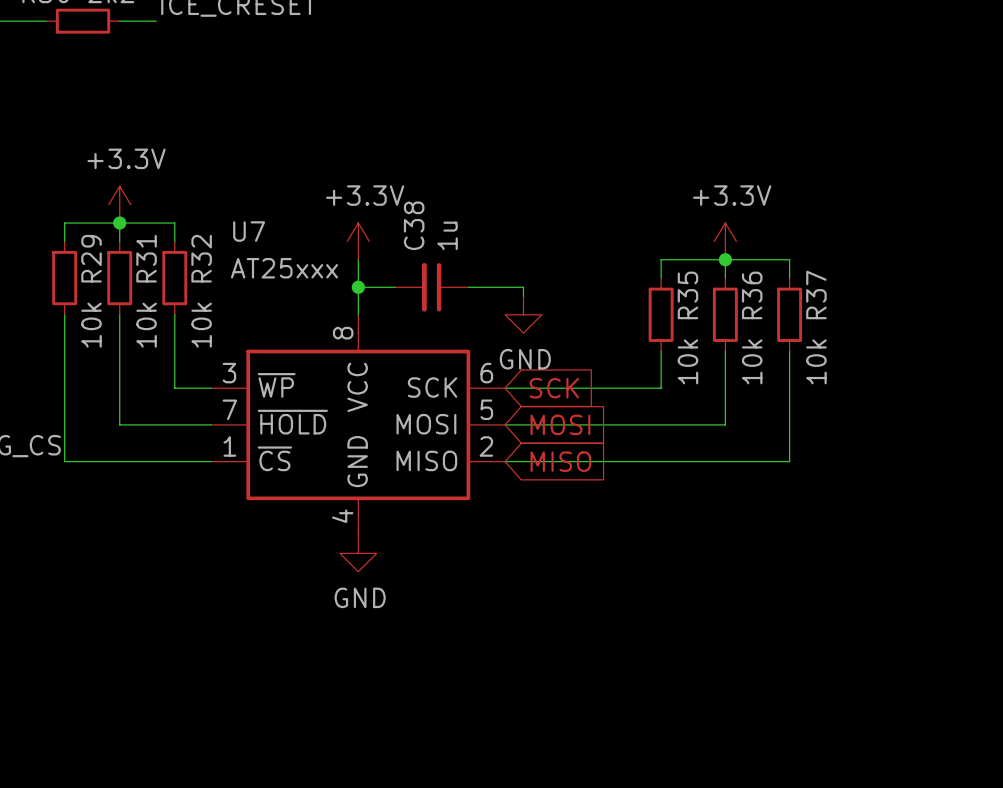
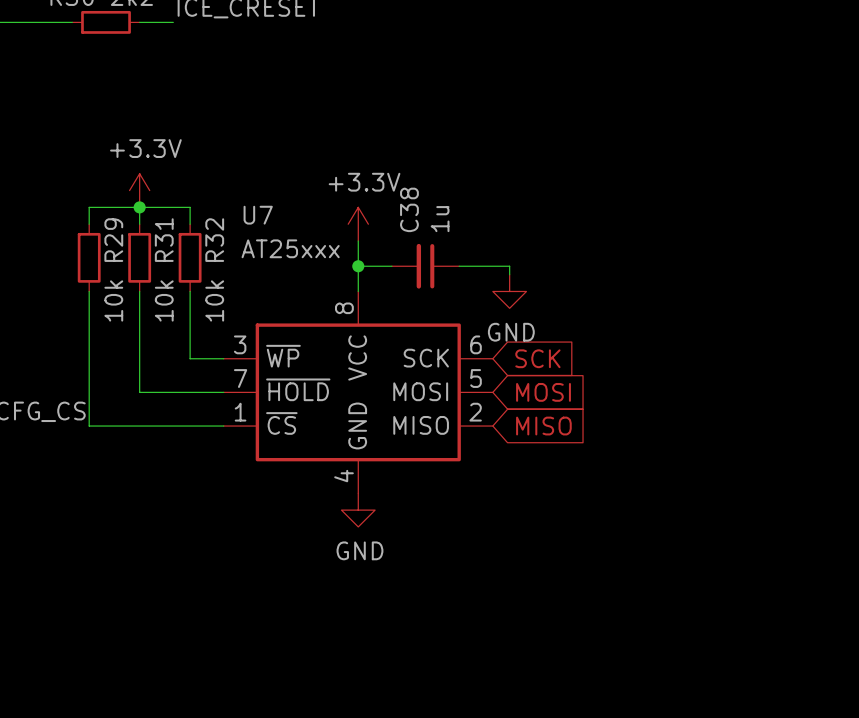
power symbol: +3.3V (725, 241) -> none
wire: (725, 259) (725, 278) -> none
junction: (725, 259) -> none
wire: (661, 278) (661, 259) (789, 259) (789, 278) -> none
R35: 10k (661, 314) -> none
R36: 10k (725, 314) -> none
R37: 10k (789, 314) -> none
wire: (661, 351) (661, 388) (505, 388) -> none
wire: (725, 351) (725, 424) (505, 424) -> none
wire: (789, 351) (789, 461) (505, 461) -> none

